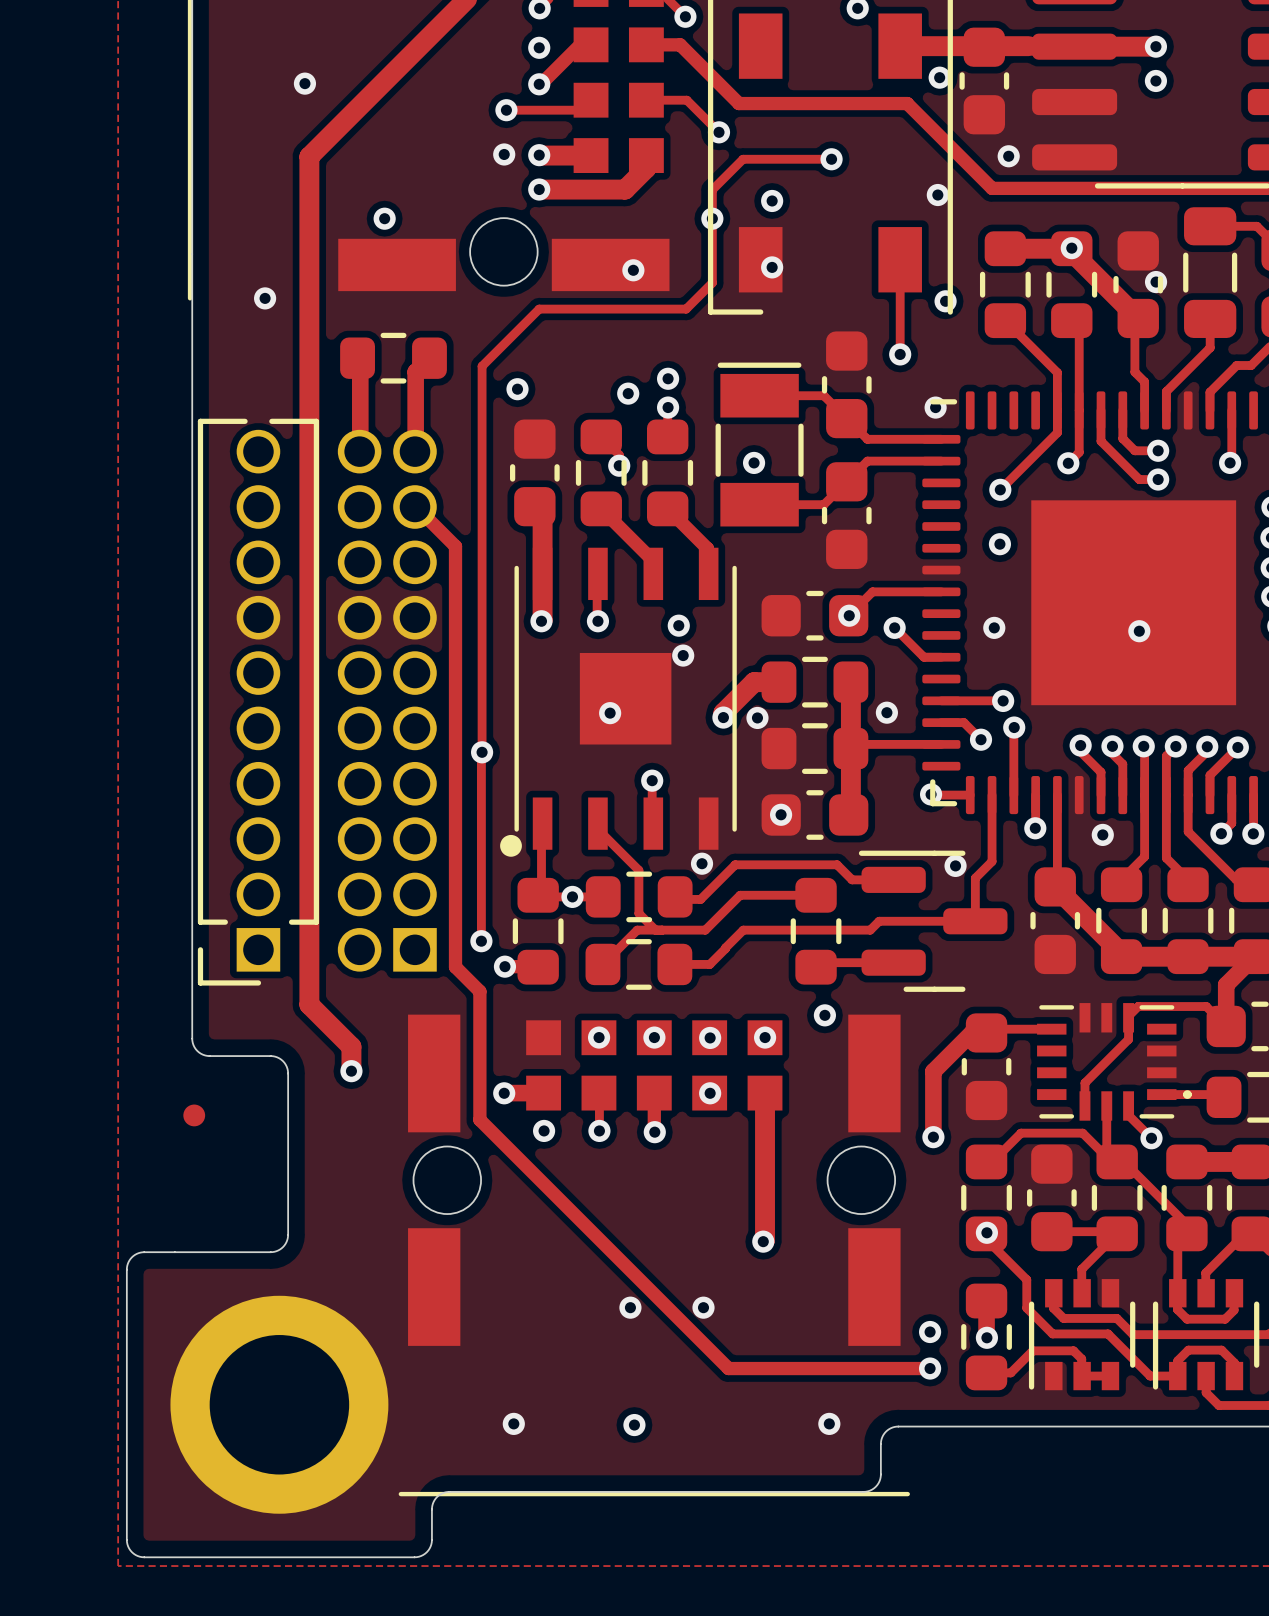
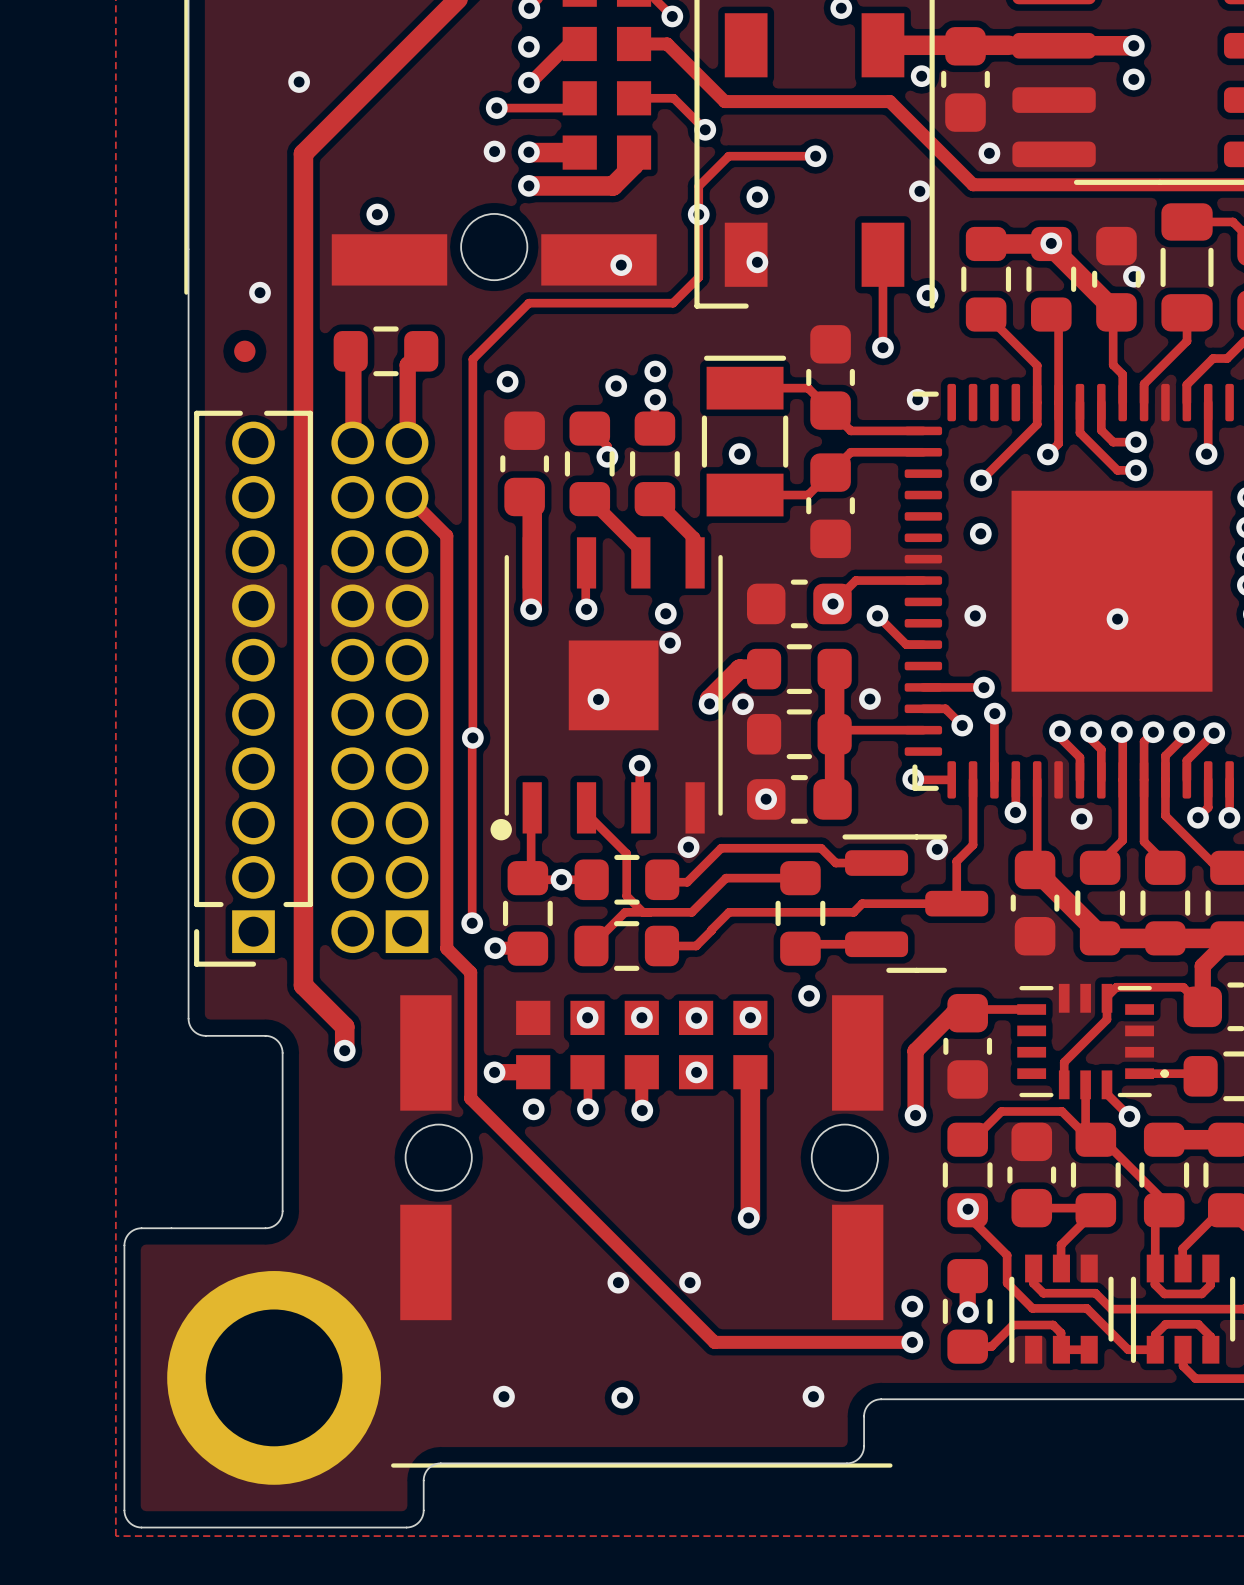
part position: (194, 1115) -> (244, 351)

